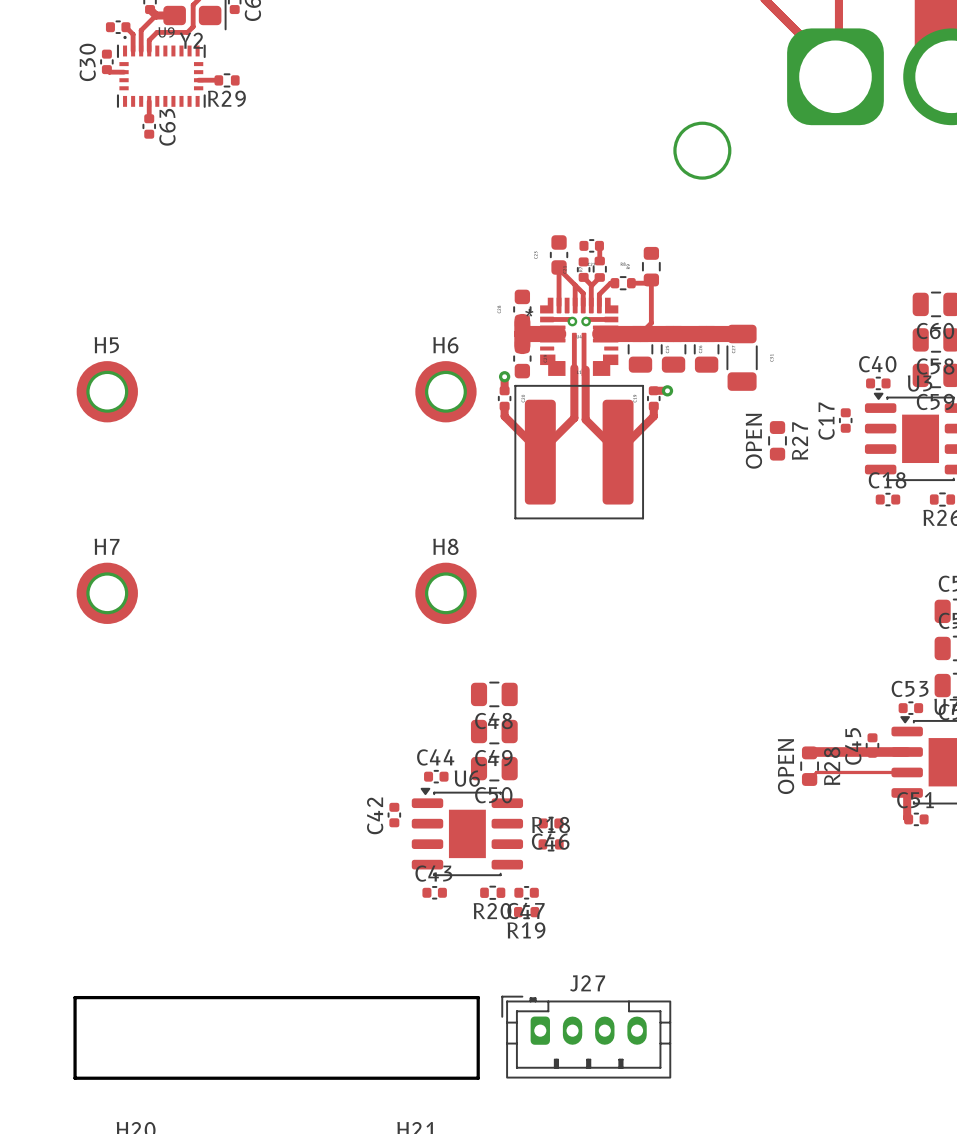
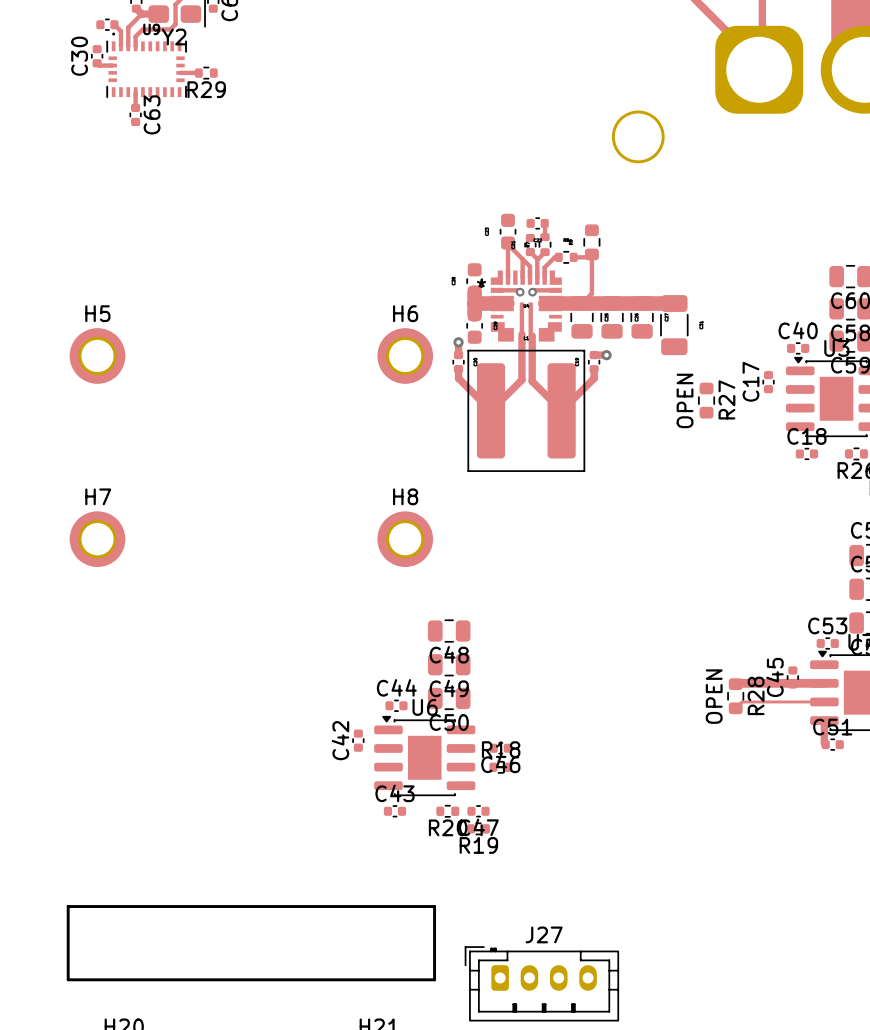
J27 position: (586, 1037) -> (541, 983)

